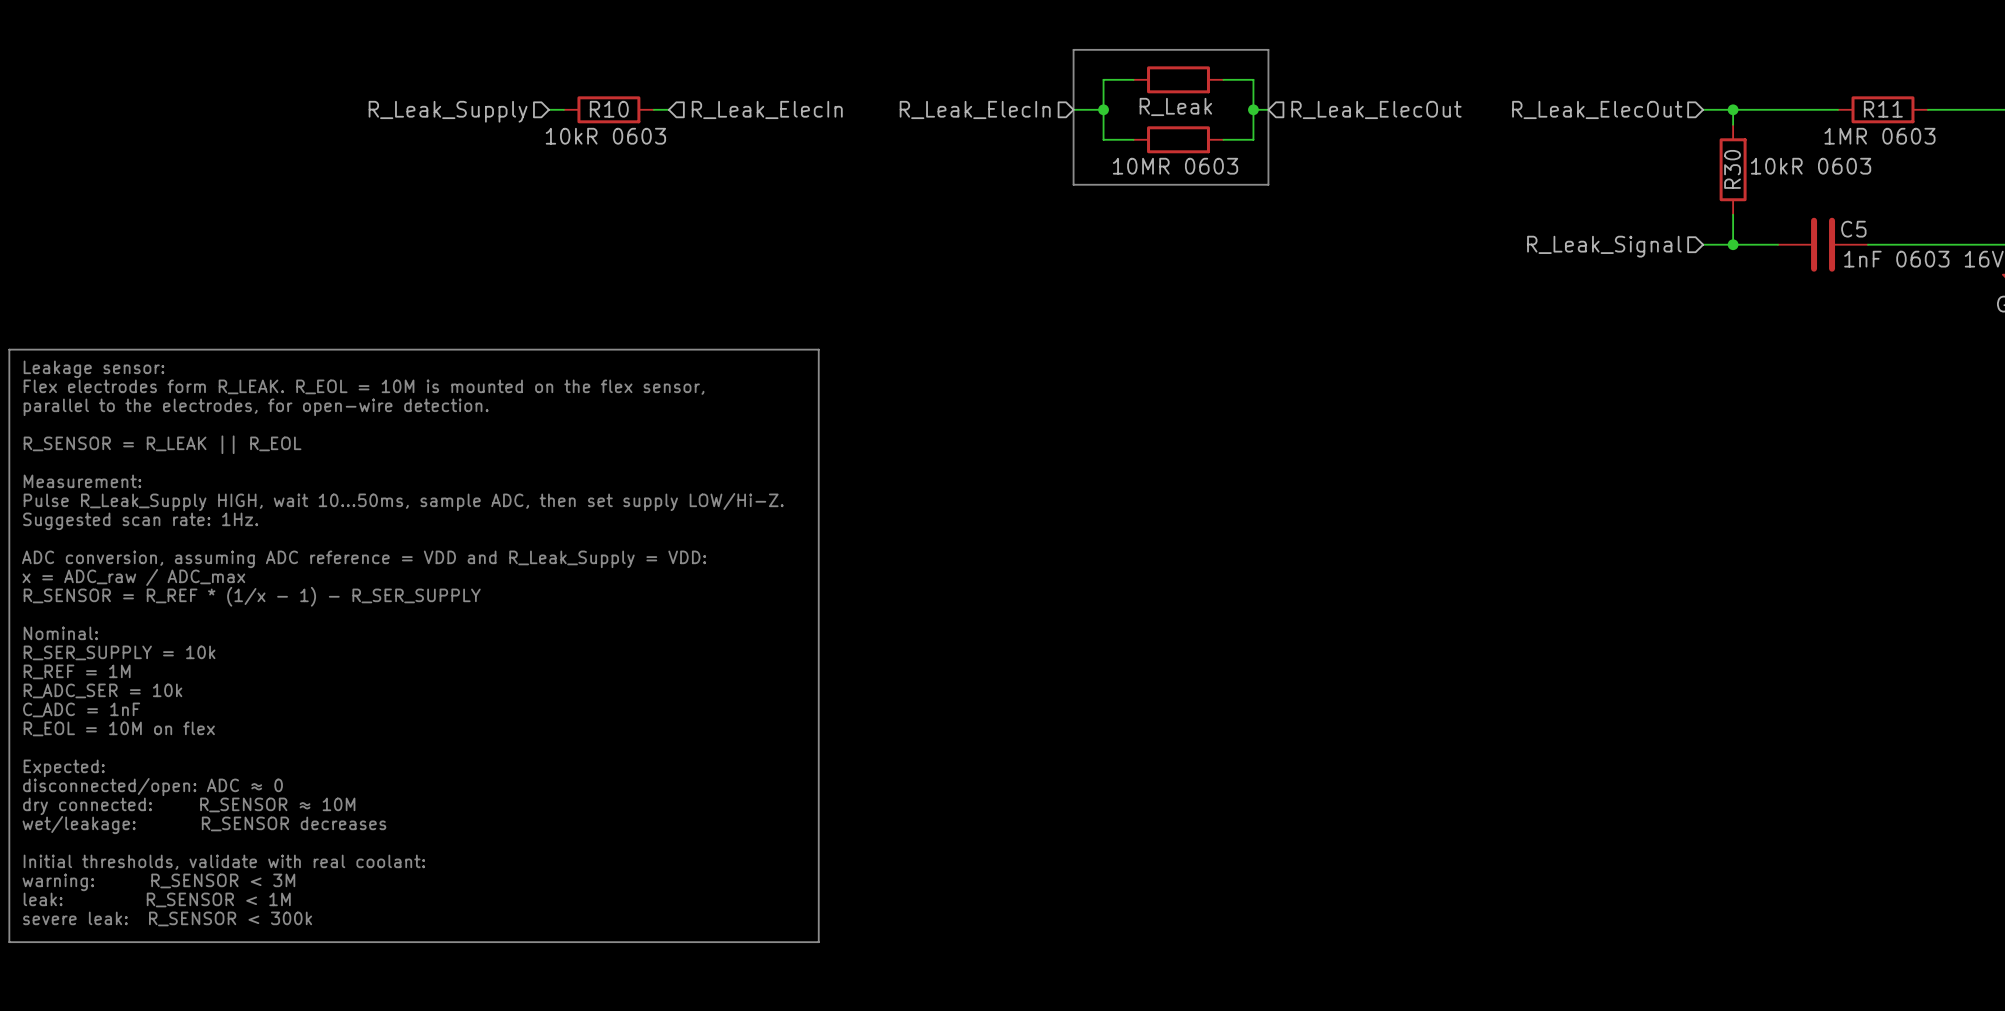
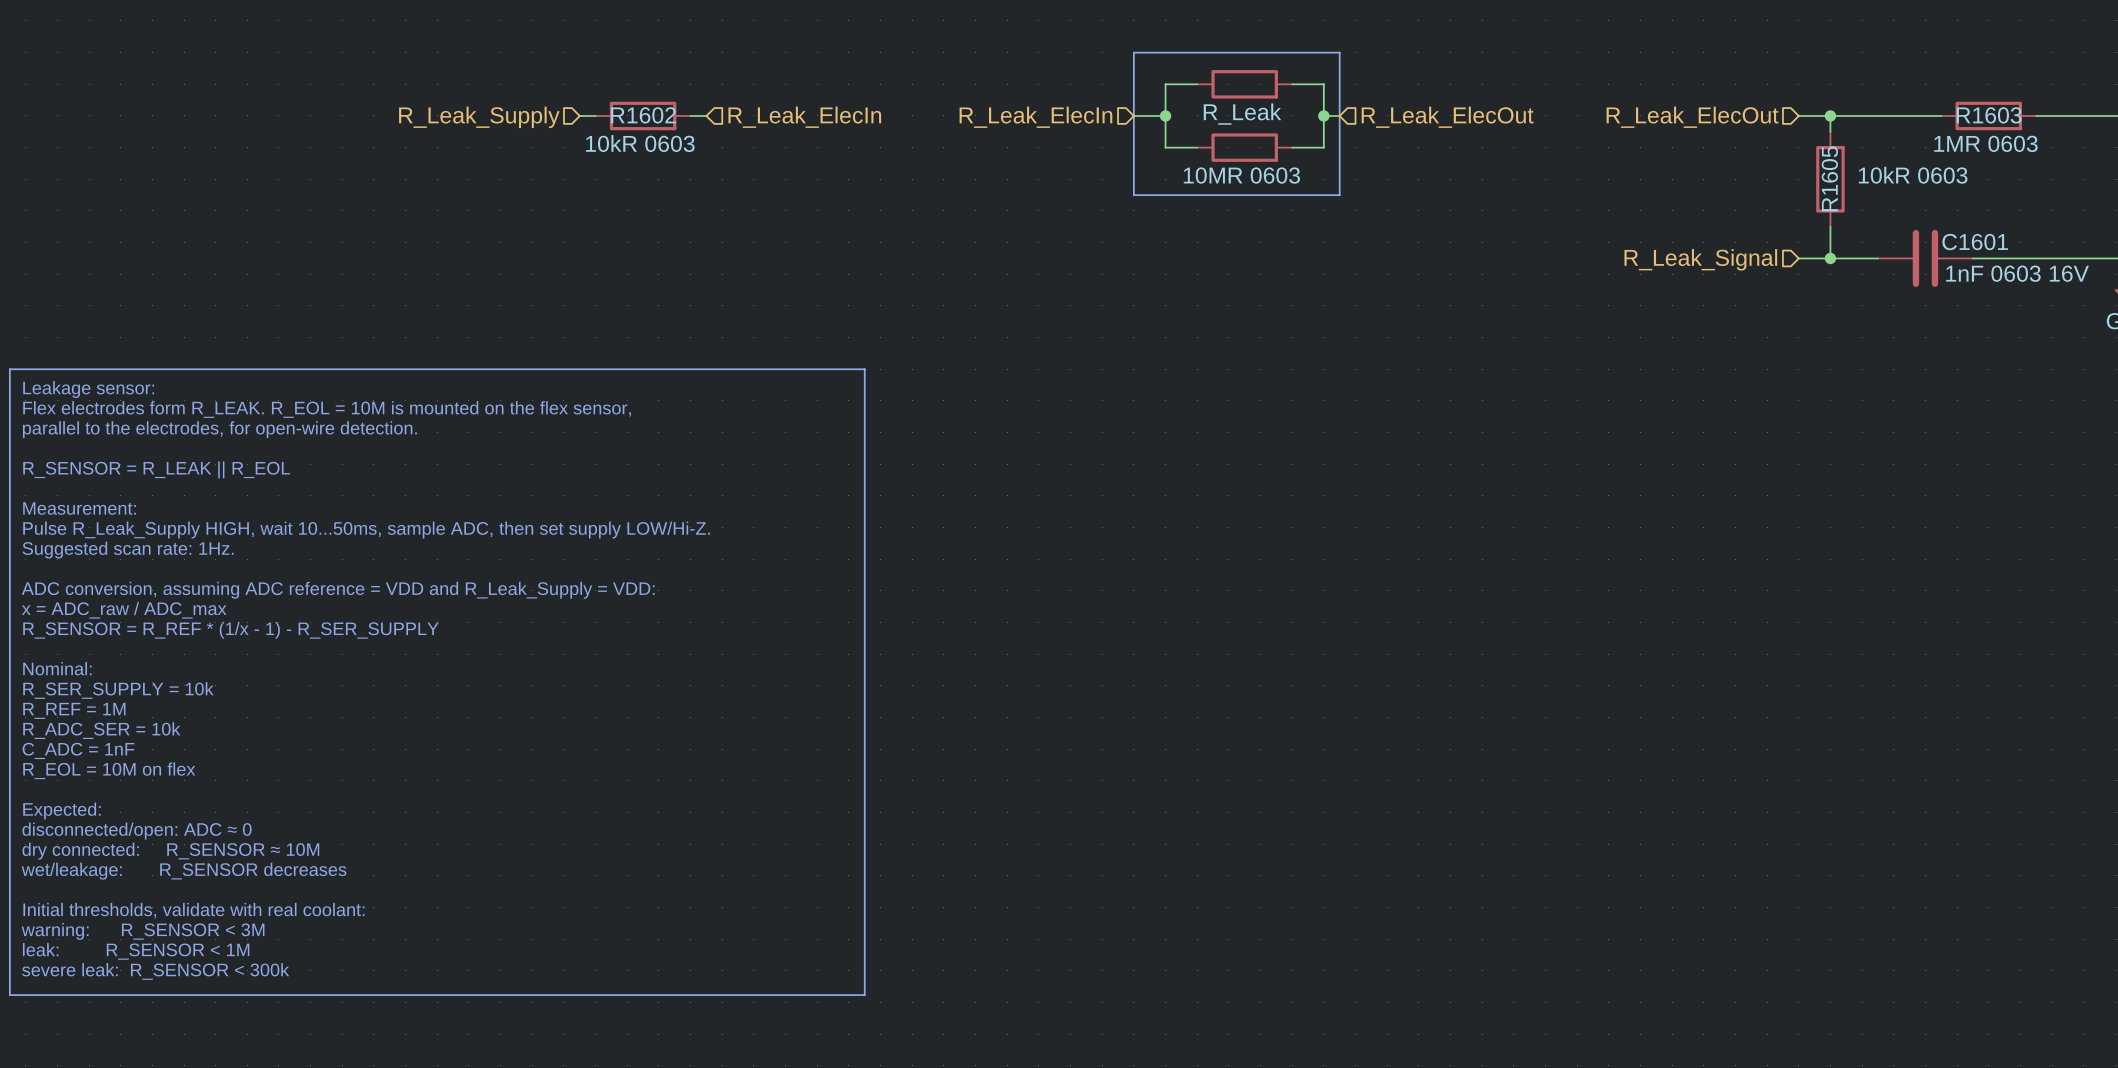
R10 name: R10 (609, 109) -> R1602 (643, 115)
R11 name: R11 (1883, 109) -> R1603 (1989, 115)
R30 name: R30 (1732, 169) -> R1605 (1829, 178)
C5 name: C5 (1853, 229) -> C1601 (1975, 242)

